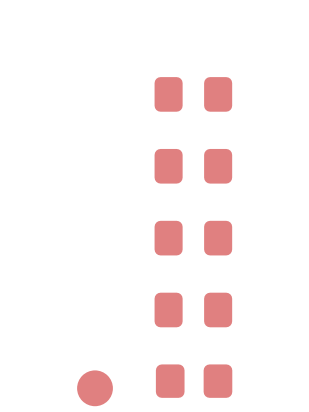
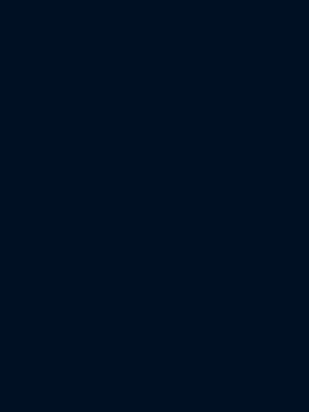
part: (193, 94) -> none
part: (193, 166) -> none
part: (193, 238) -> none
part: (193, 309) -> none
part: (194, 381) -> none
part: (95, 388) -> none

